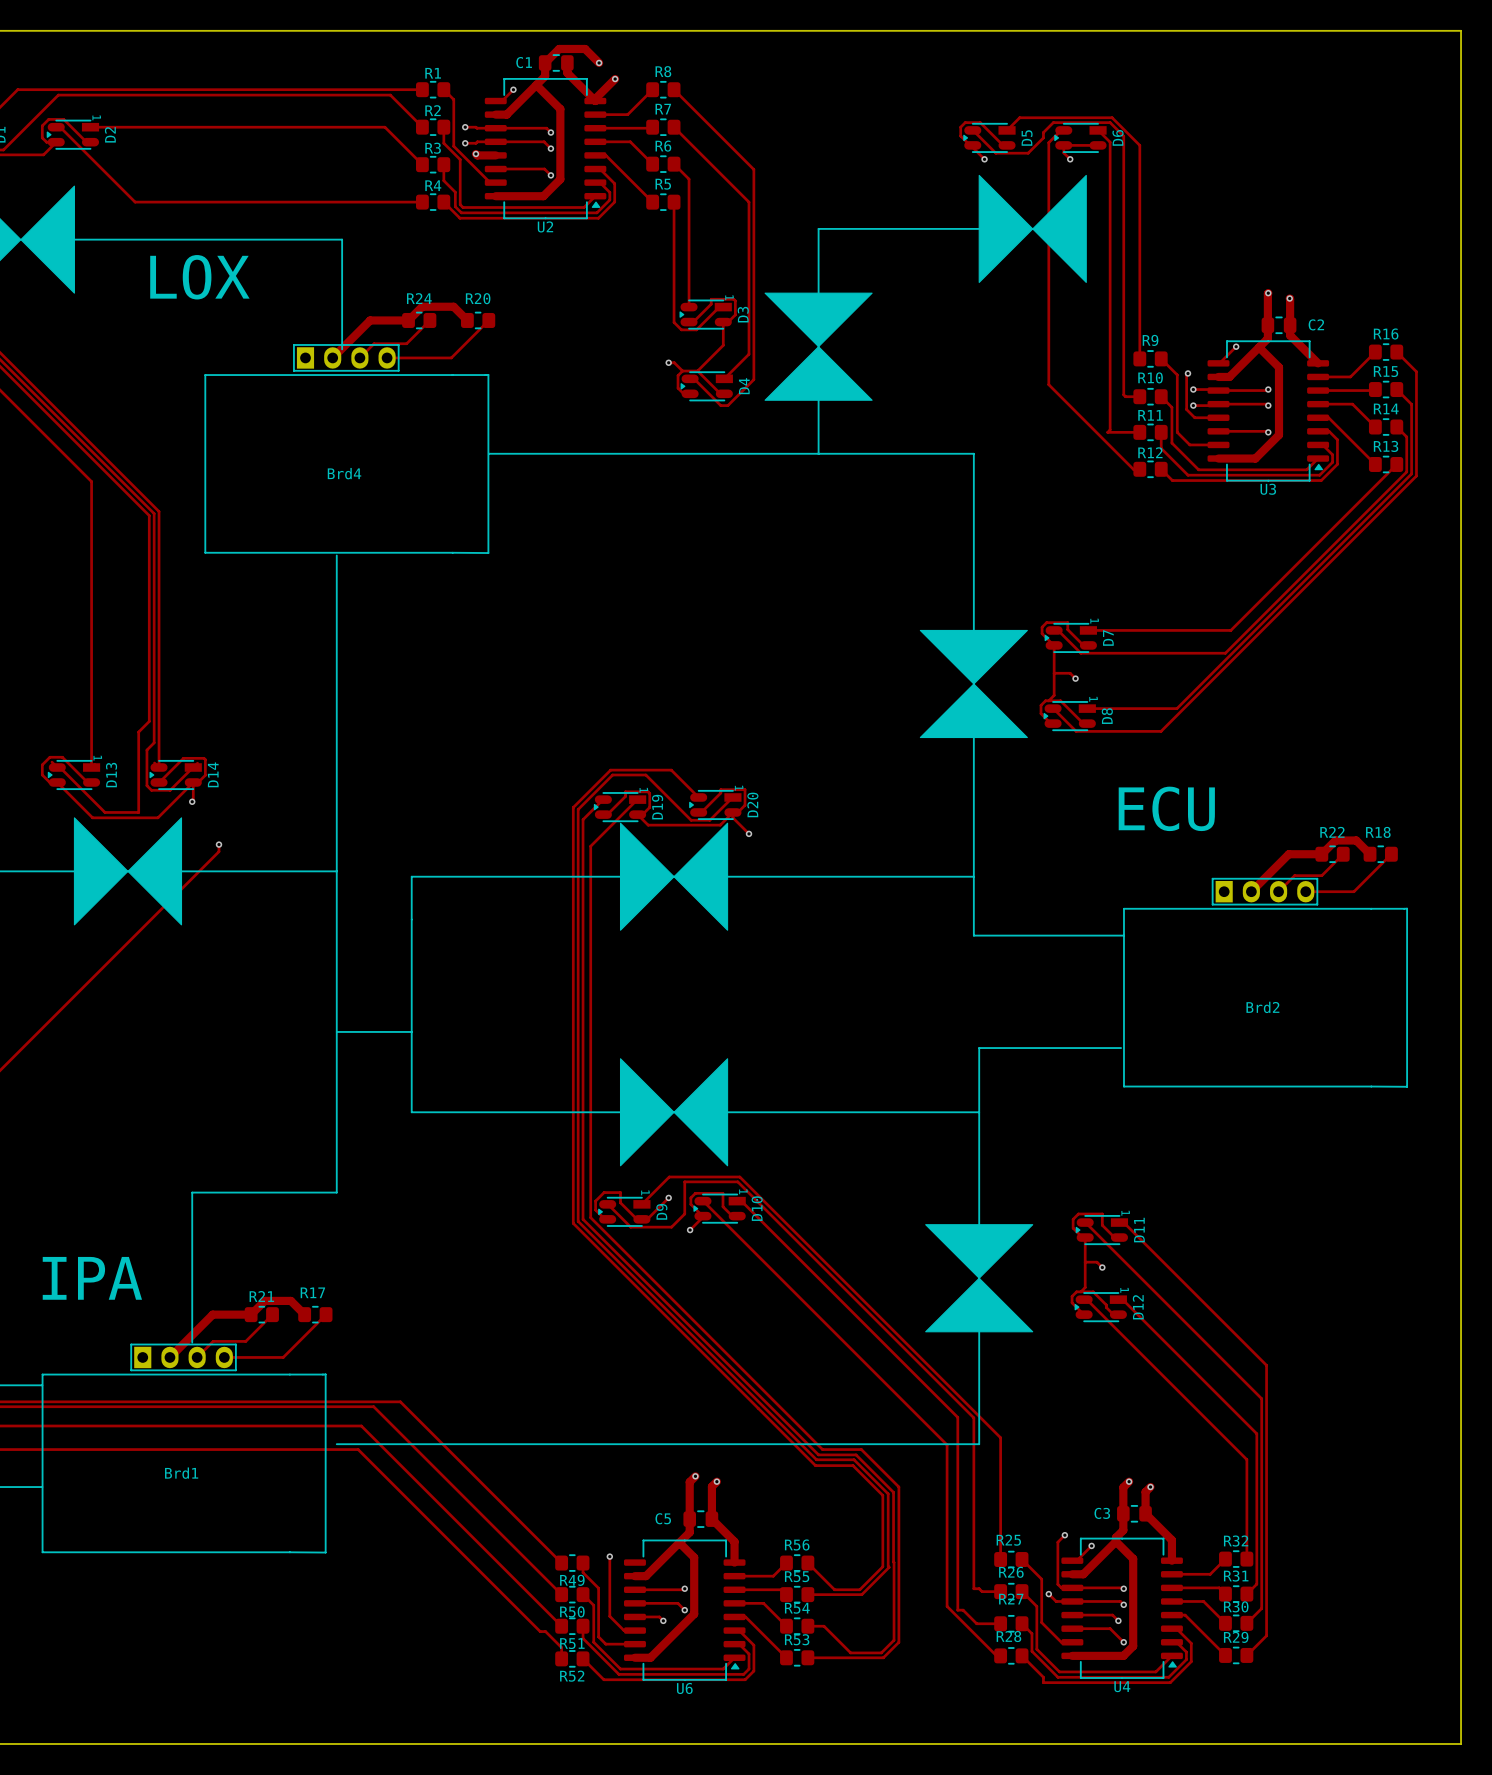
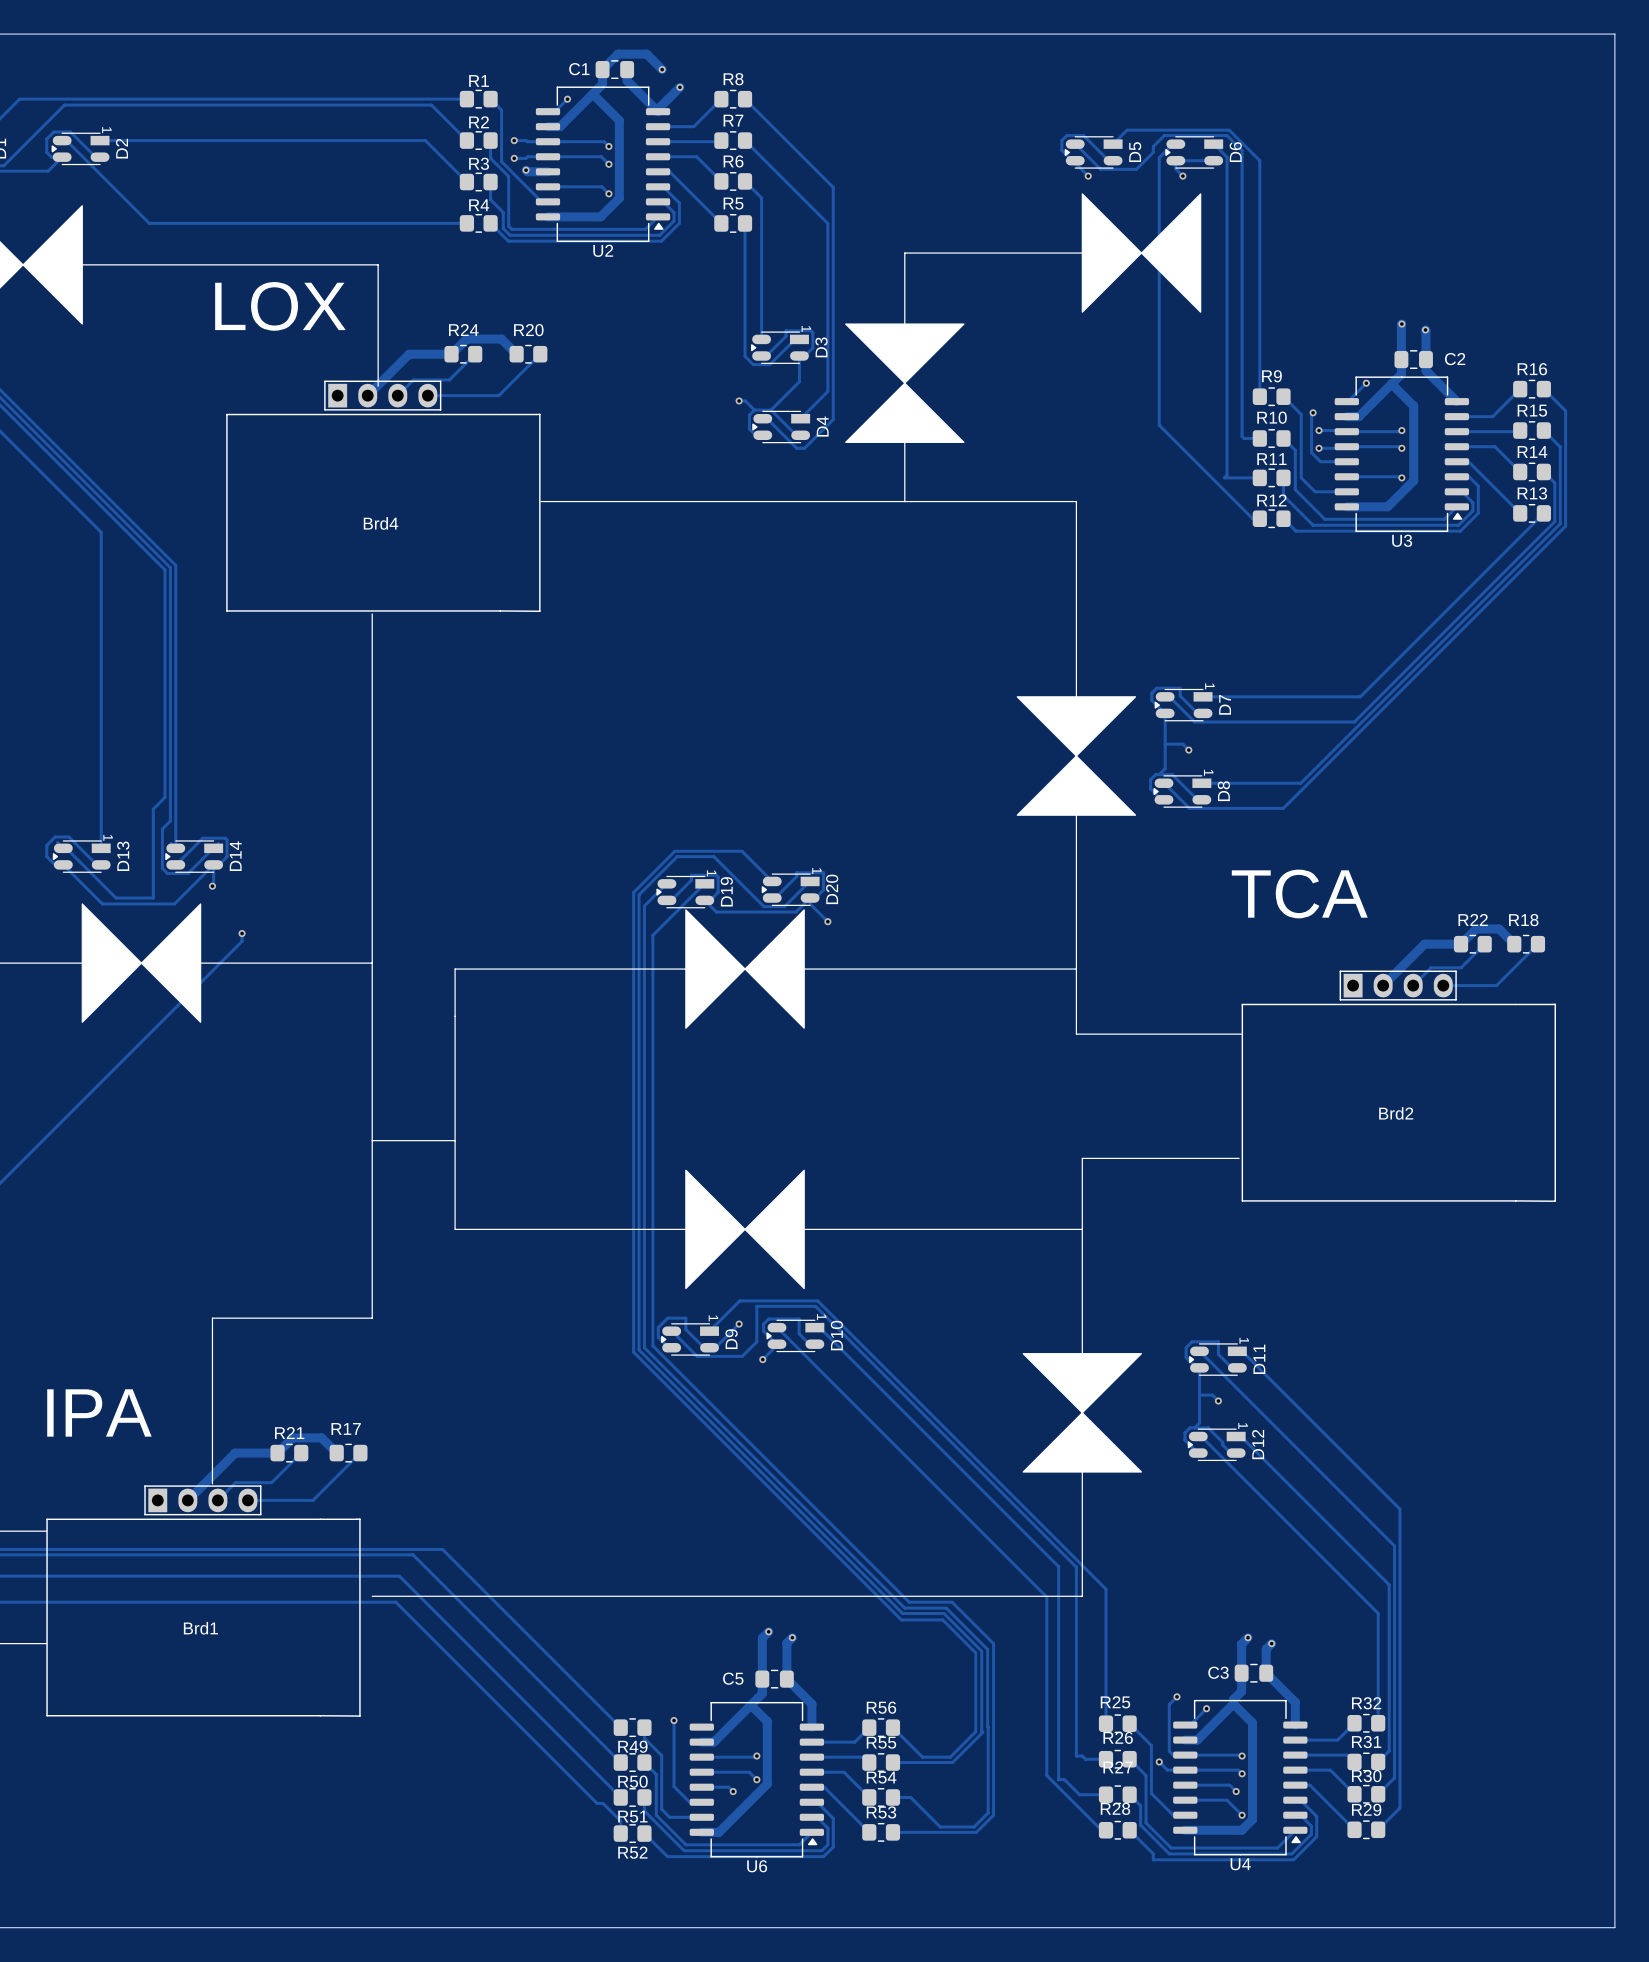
text position: LOX (199, 277) -> LOX (280, 306)
text: ECU (1166, 808) -> TCA (1299, 893)

